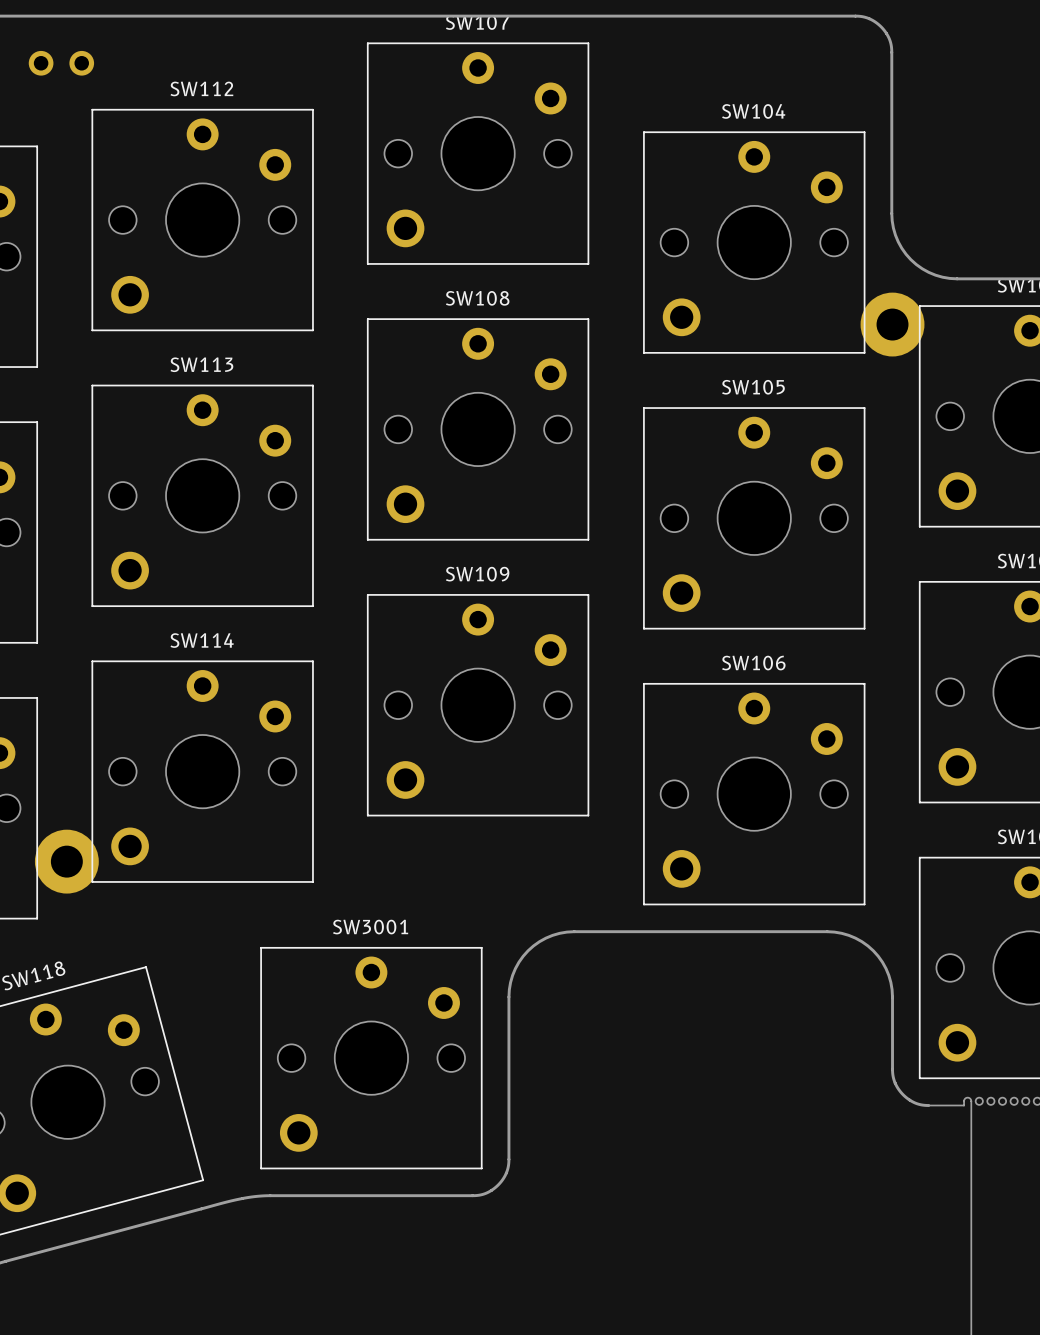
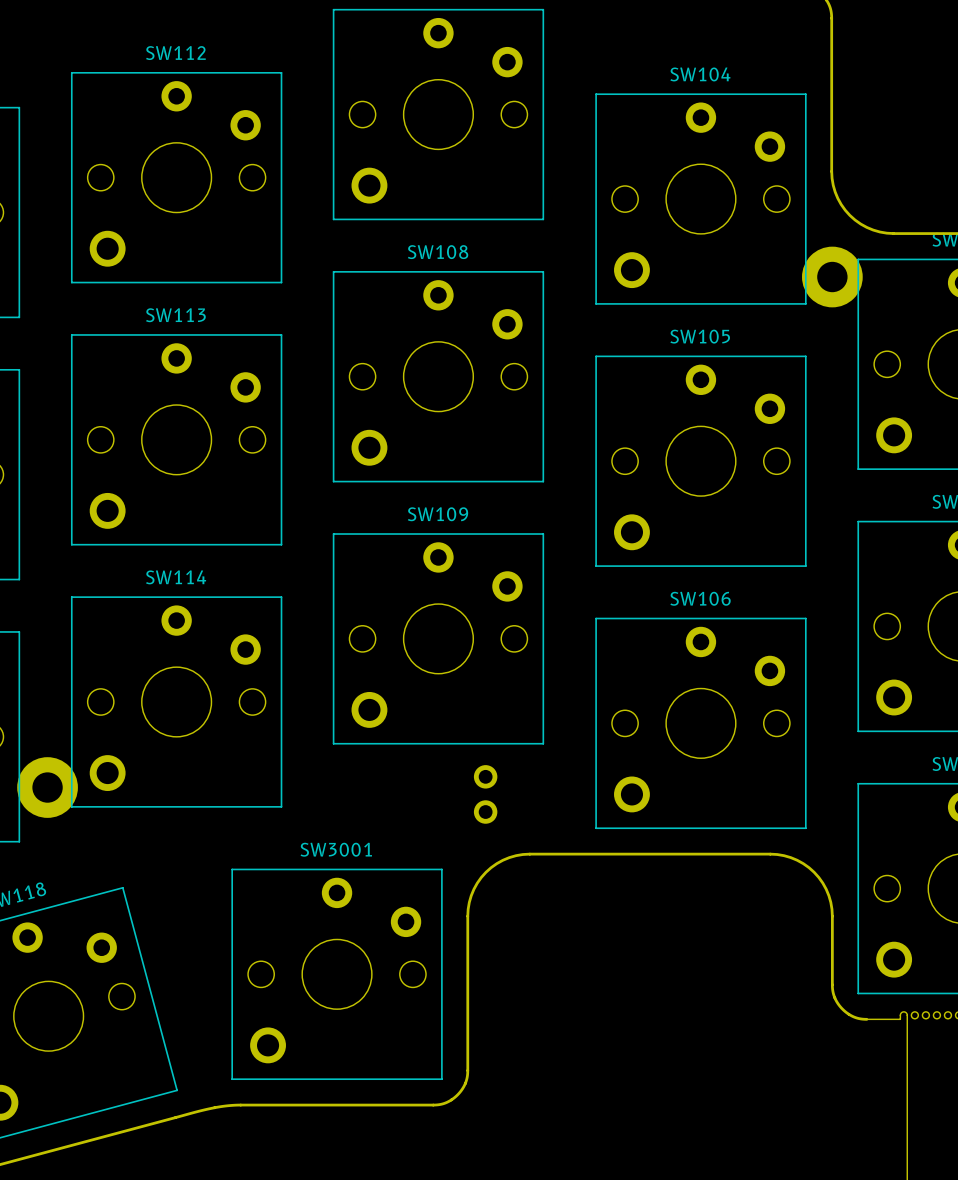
part: (61, 63) -> none
part: none -> (485, 794)

